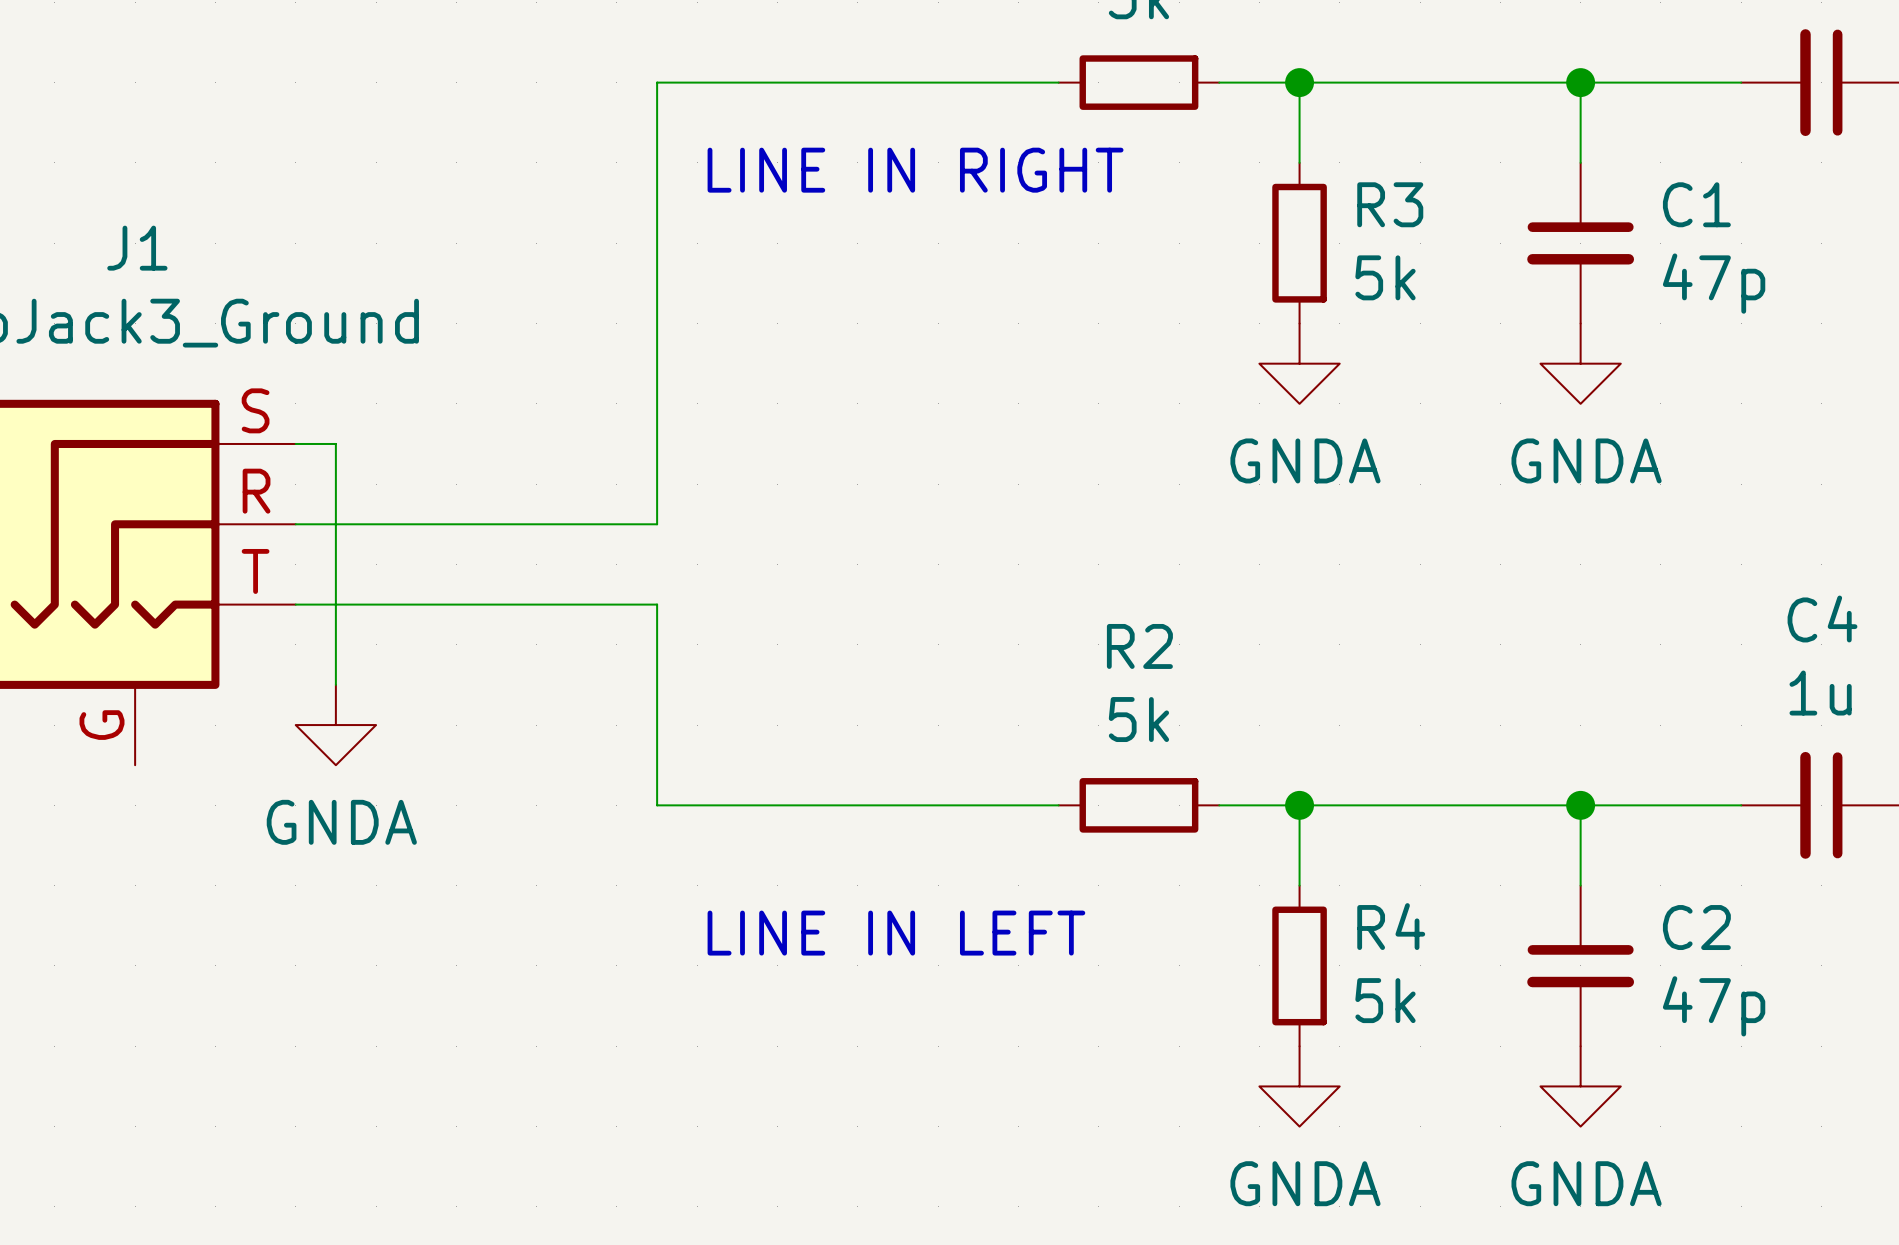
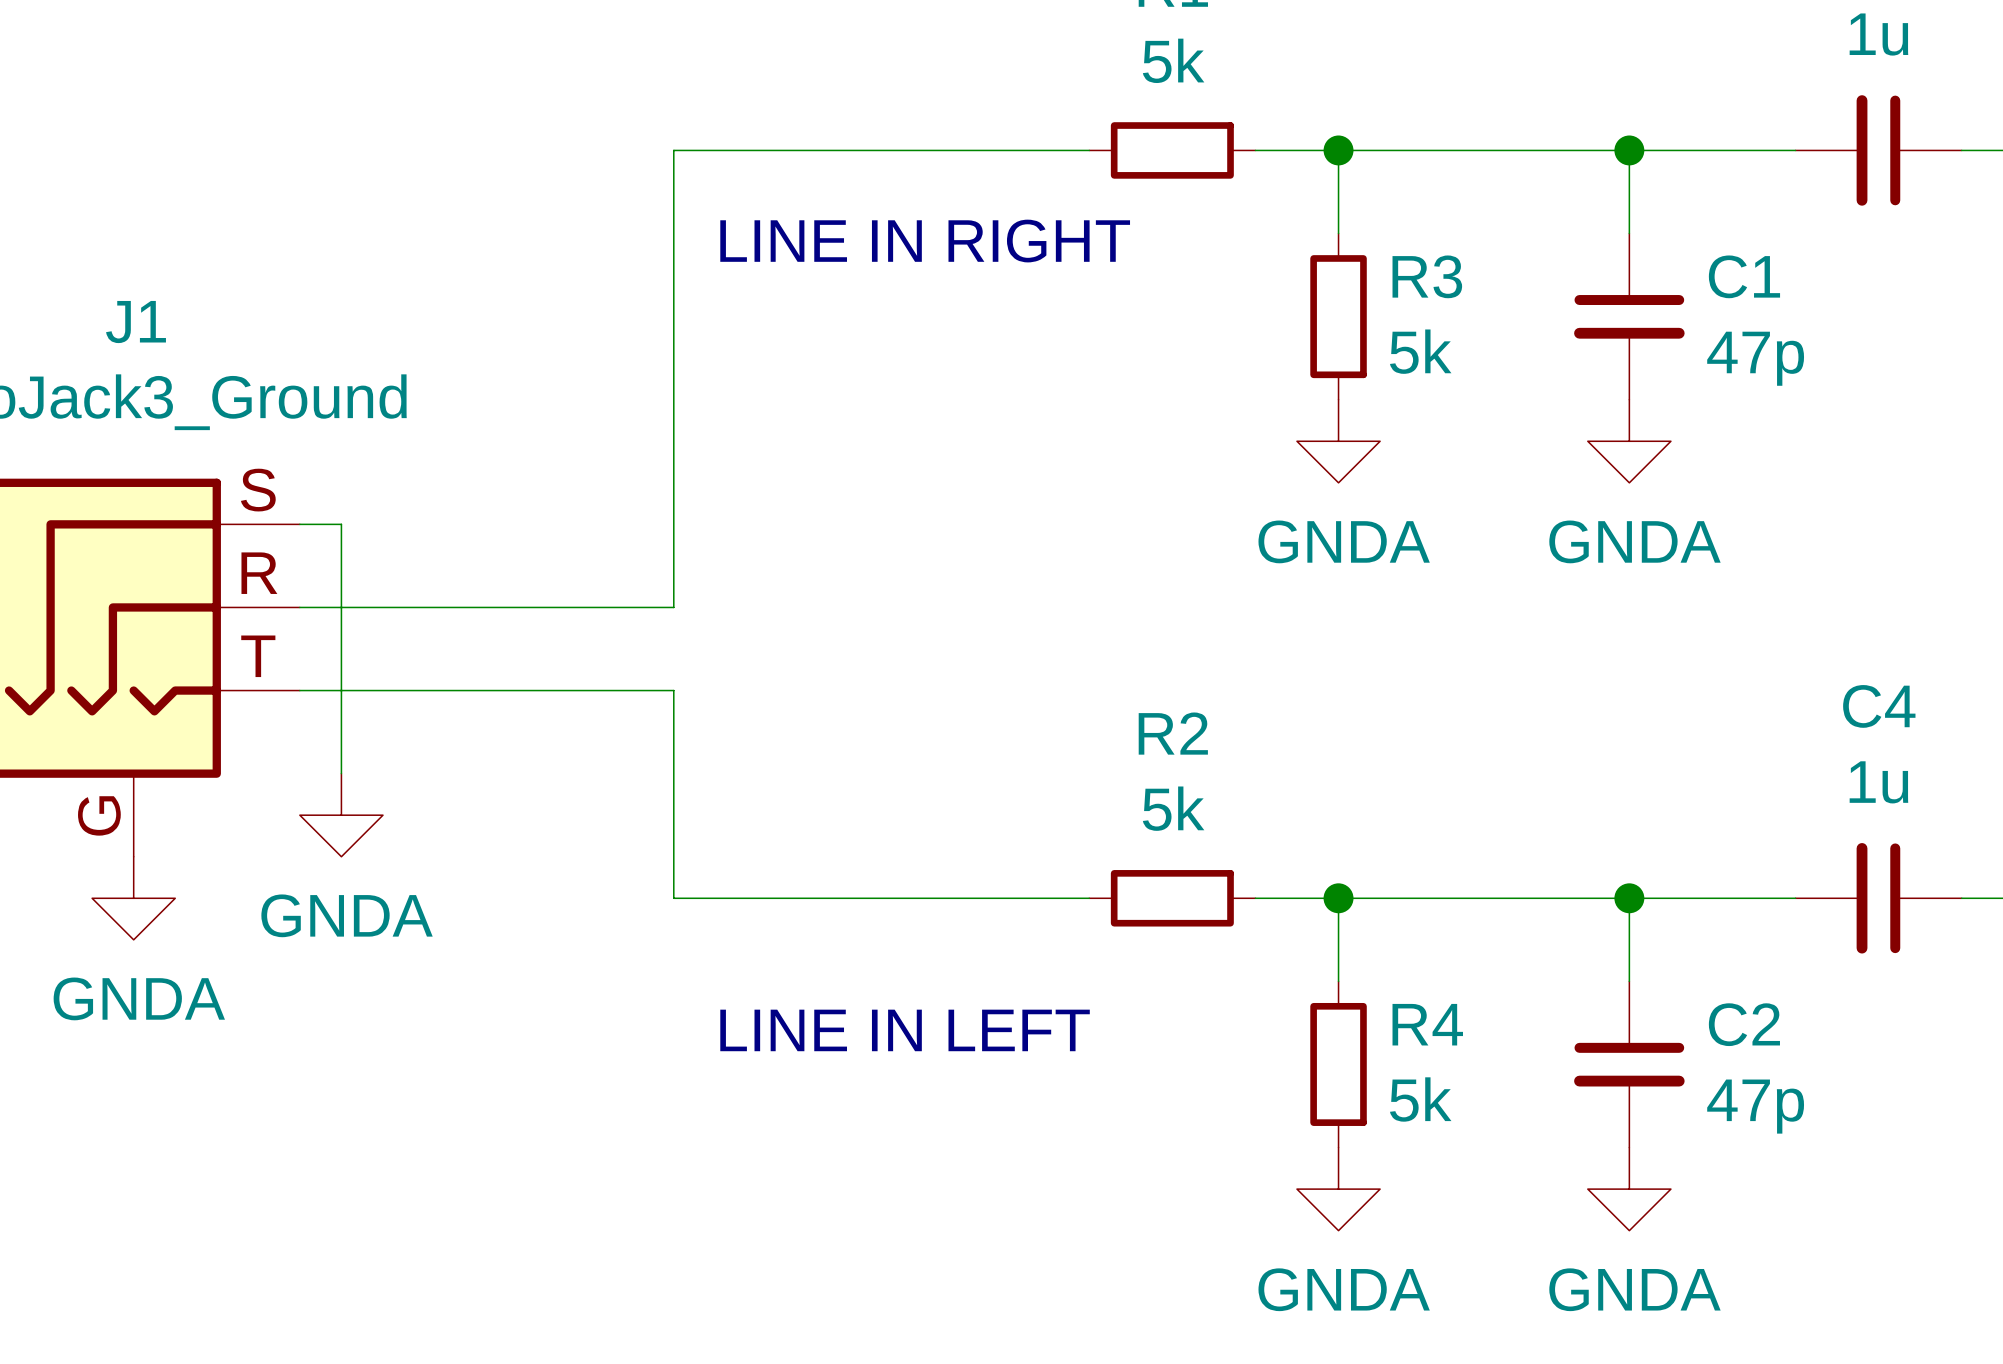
power symbol: none -> GNDA (133, 898)

